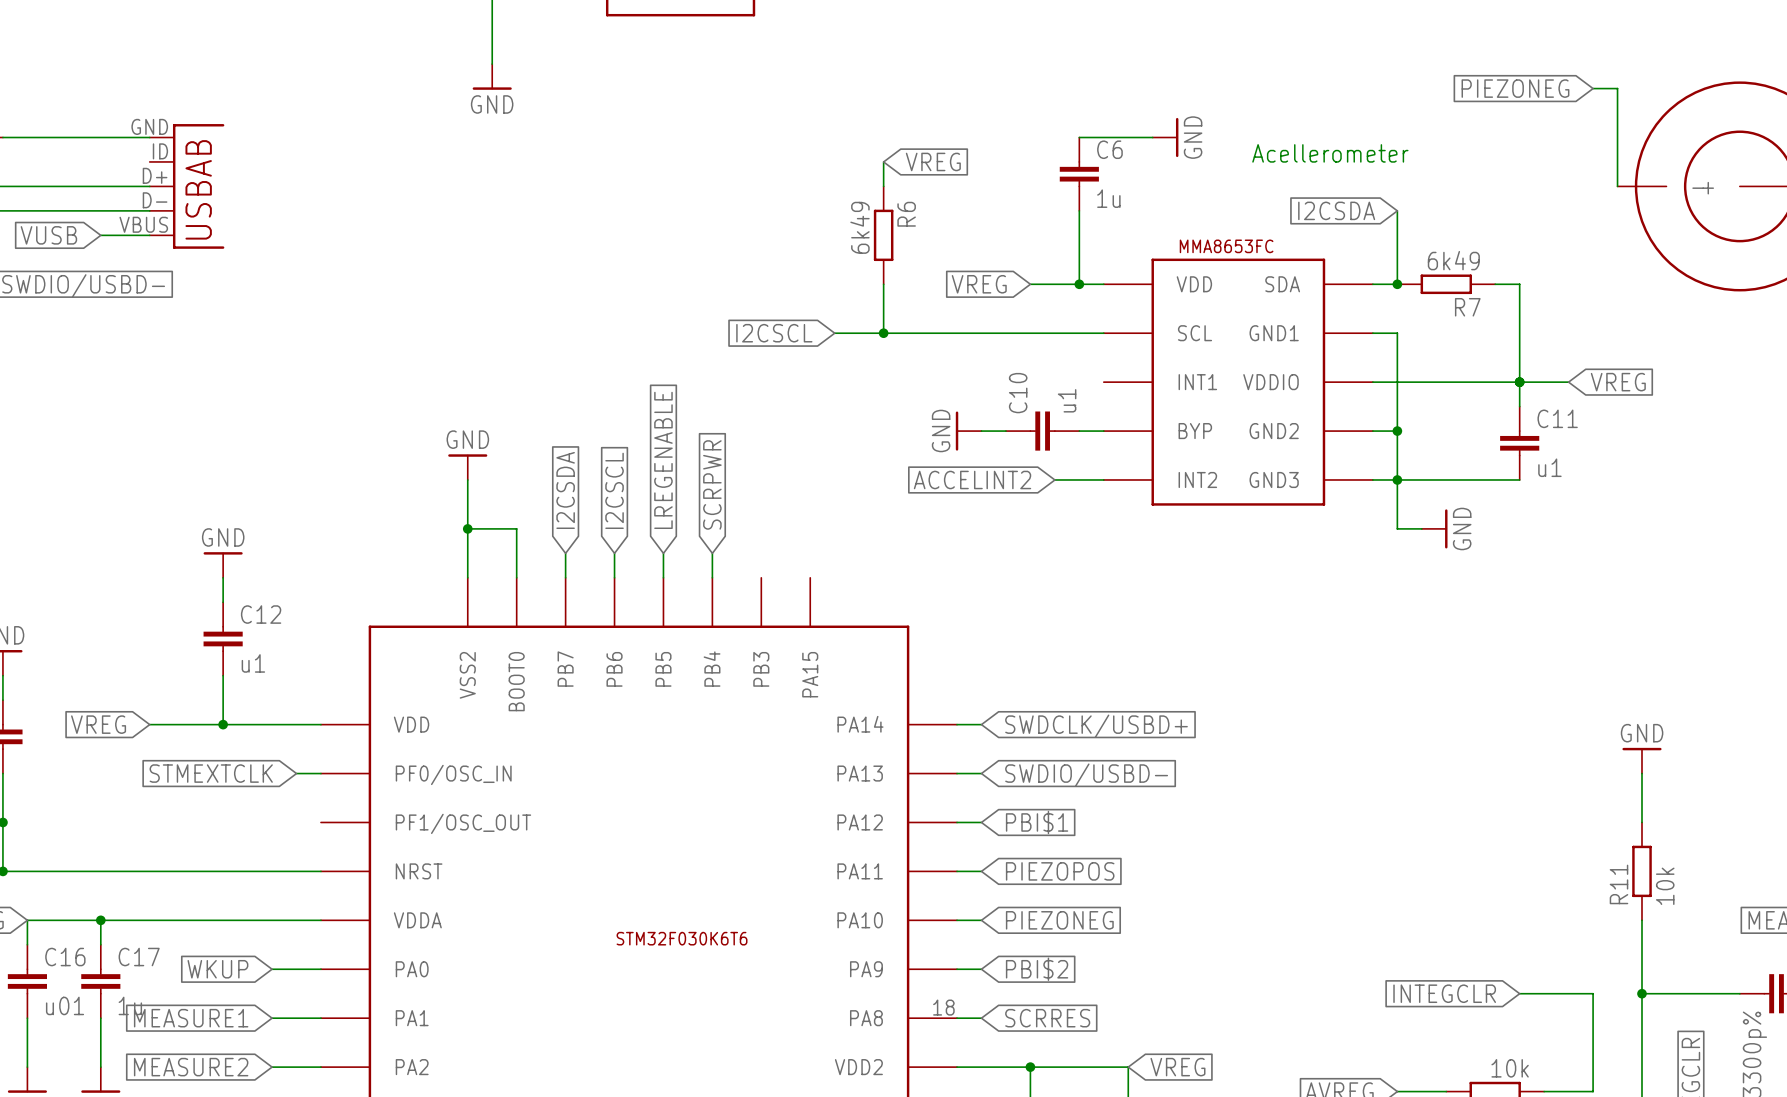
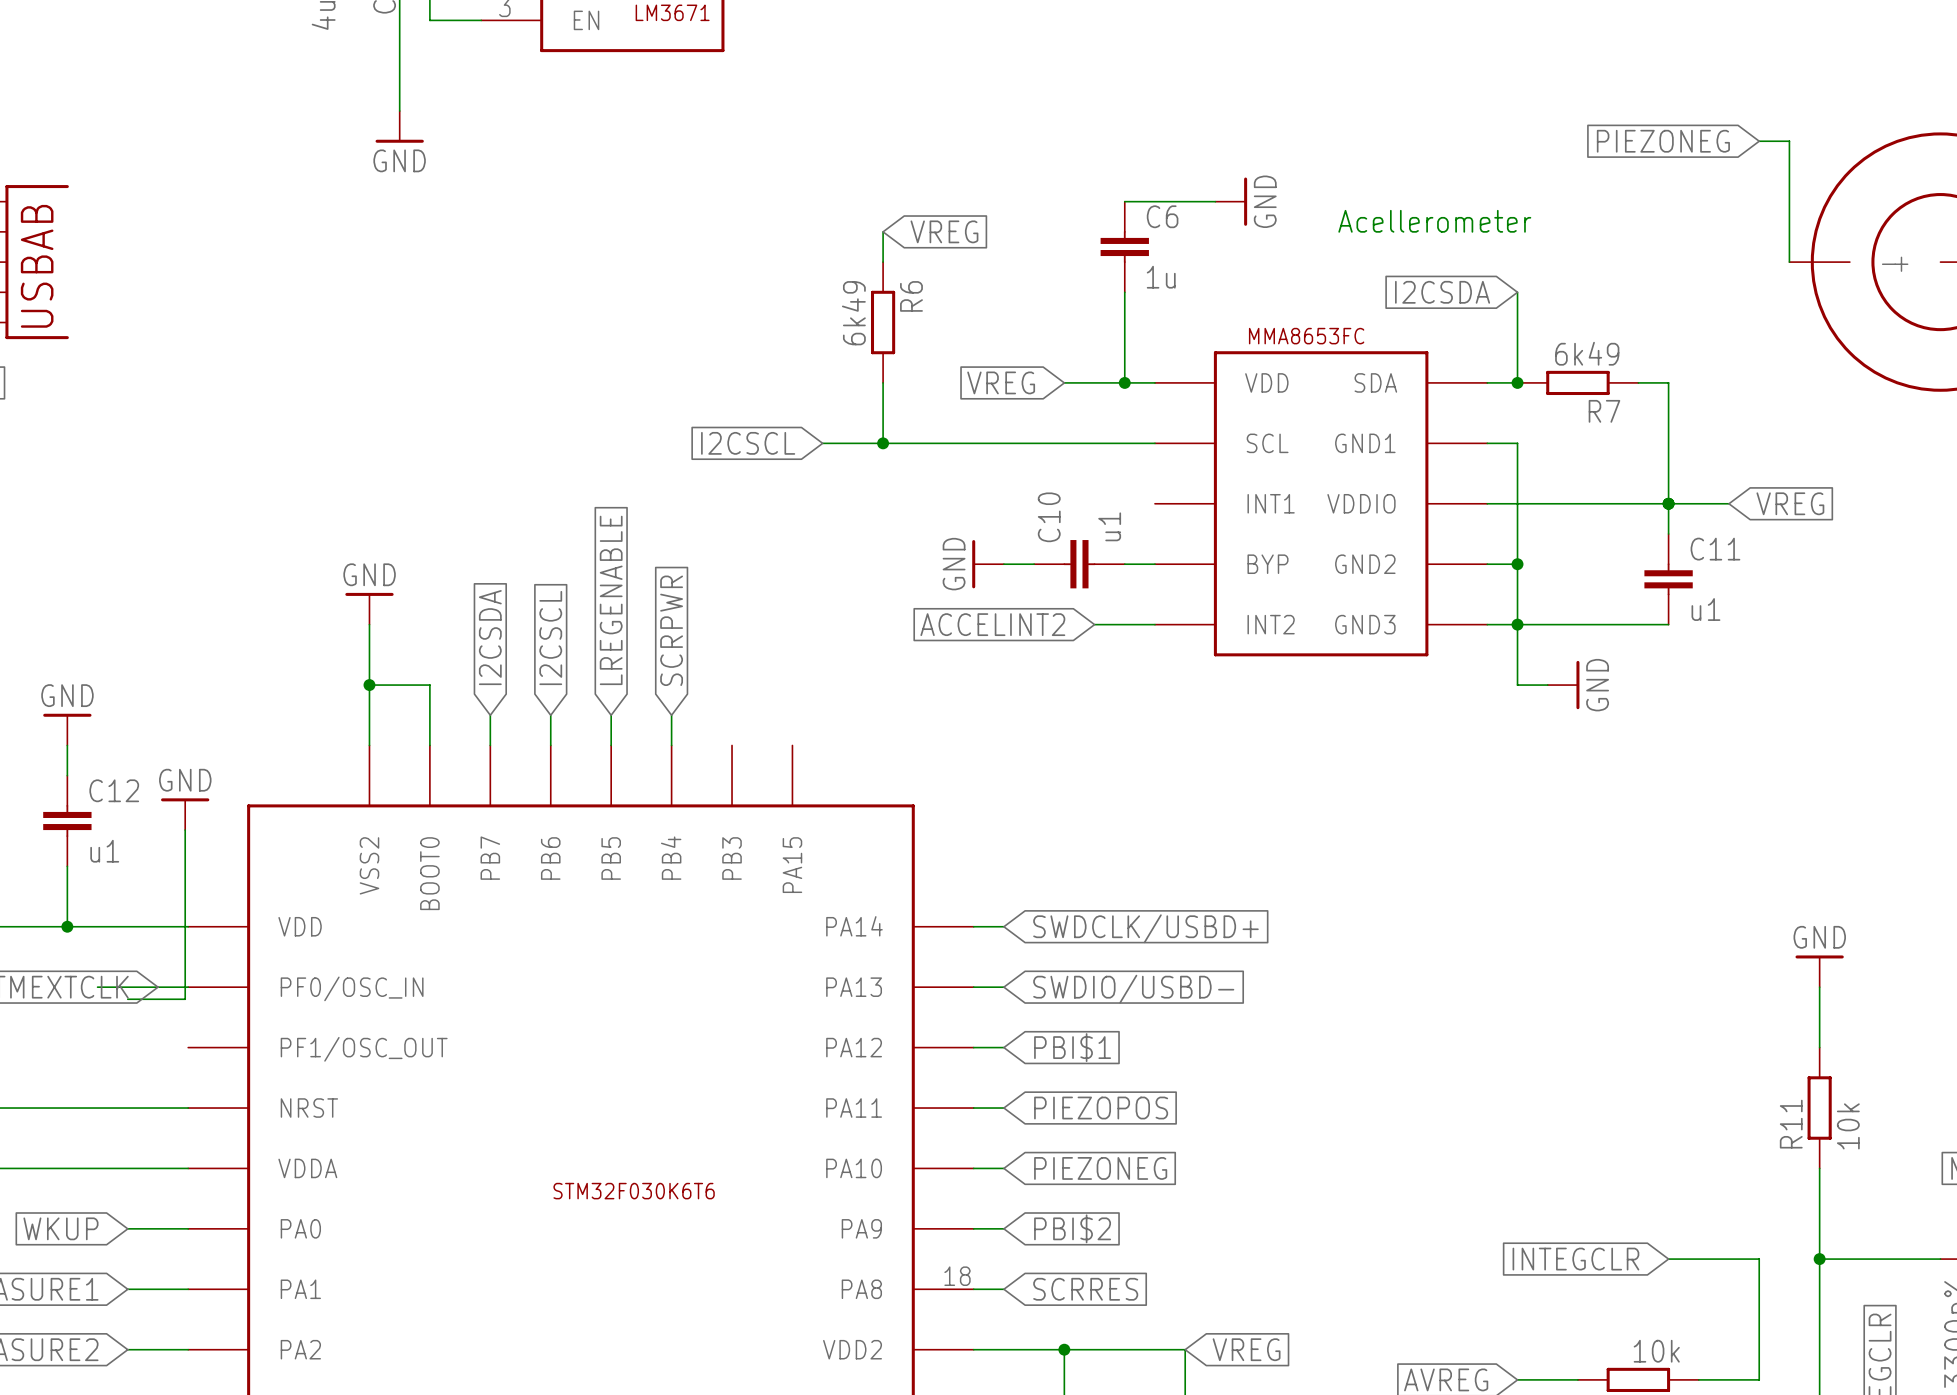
power symbol: none -> GND (185, 814)
wire: none -> (185, 830) (185, 999) (127, 999)
wire: none -> (97, 987) (158, 987)

